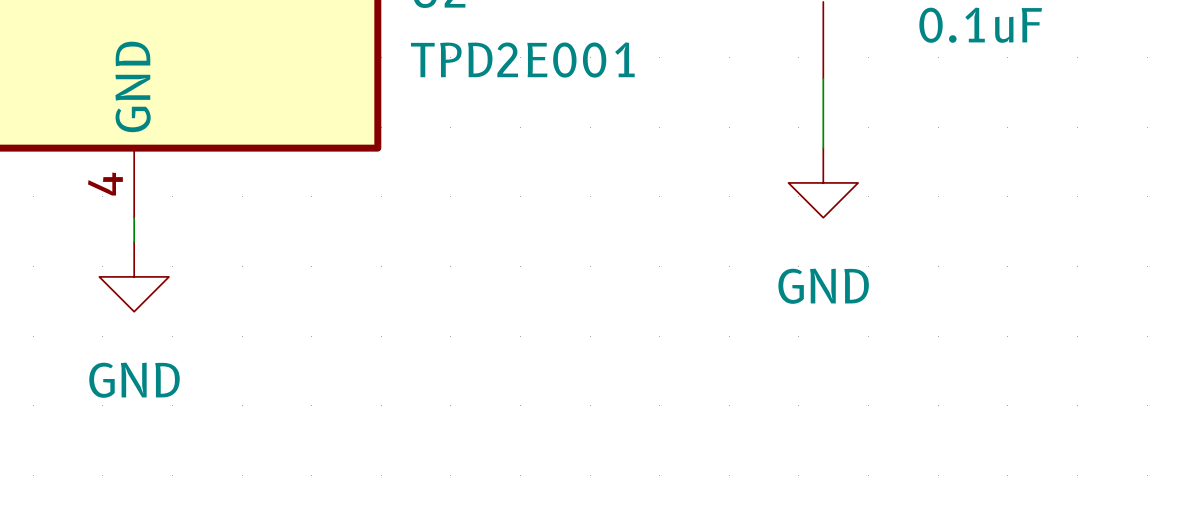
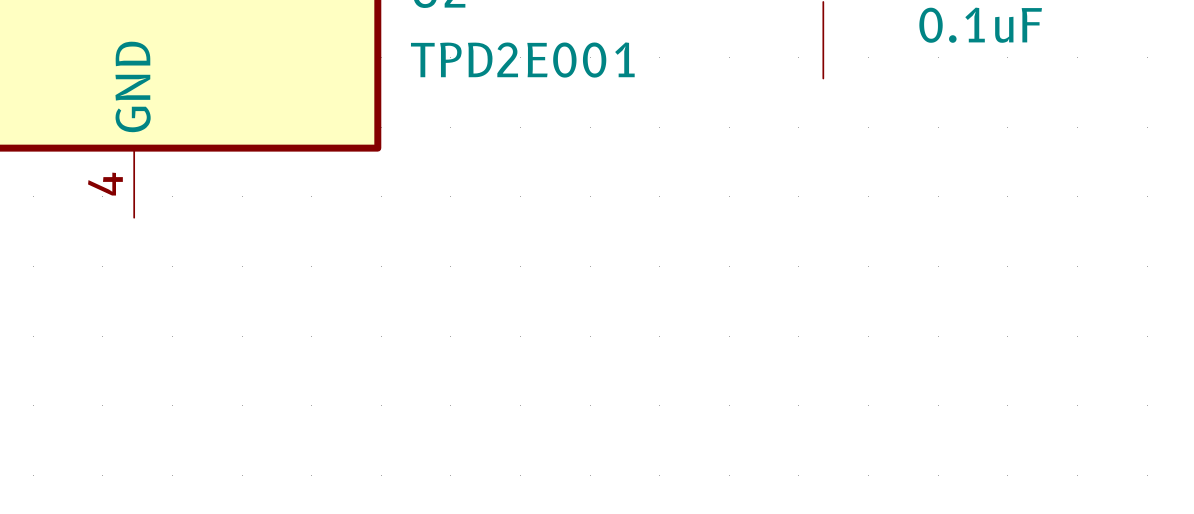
wire: (823, 78) (823, 148) -> none
power symbol: GND (823, 182) -> none
wire: (134, 217) (134, 242) -> none
power symbol: GND (134, 276) -> none

